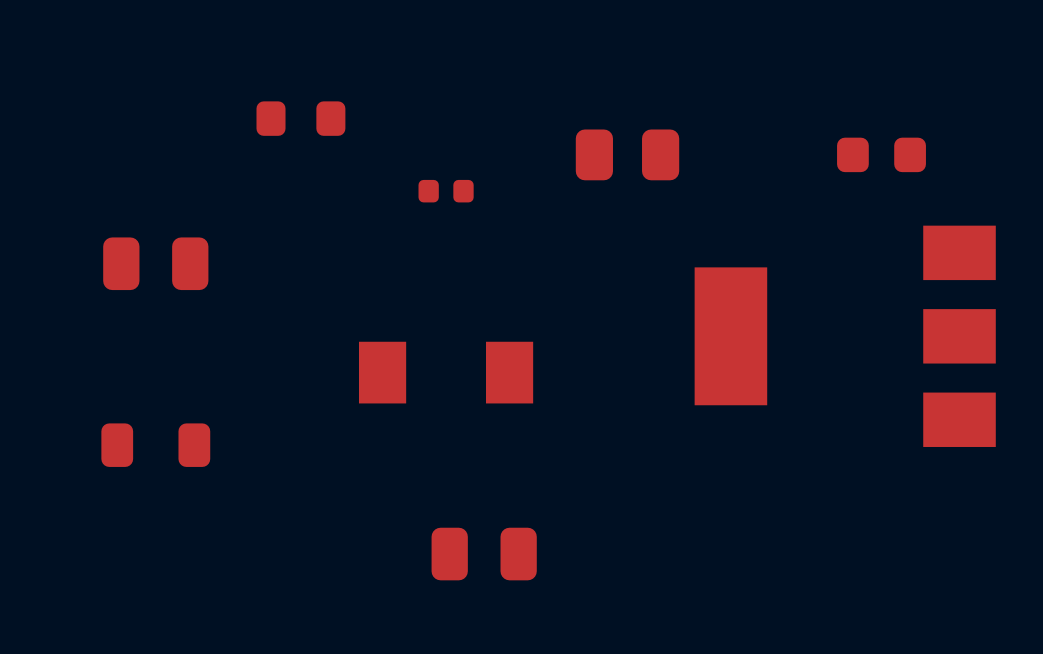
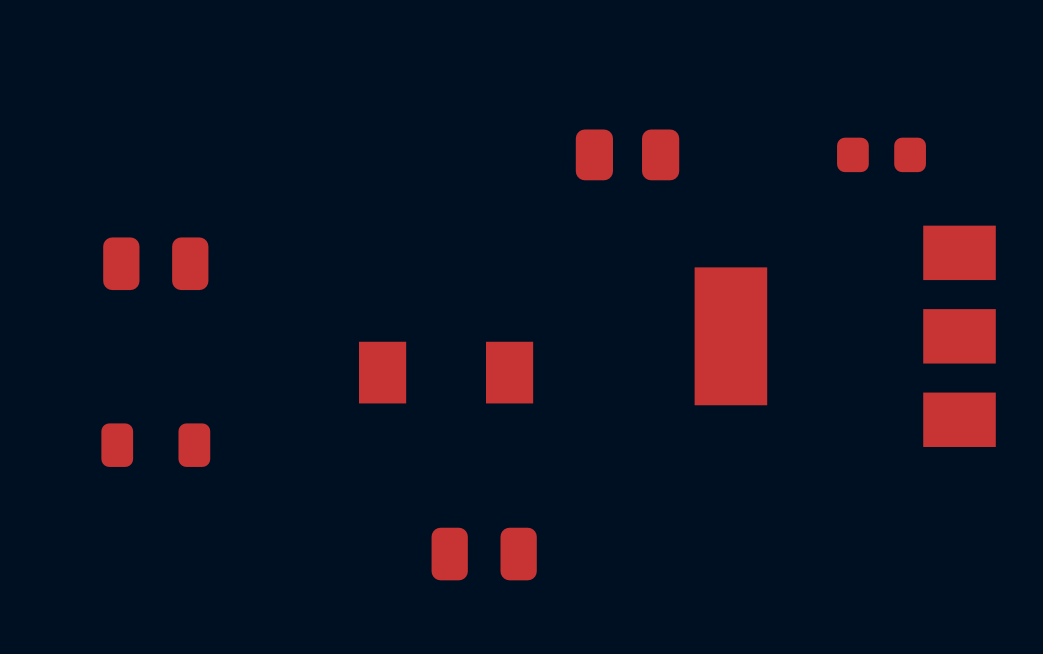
part: (300, 118) -> none
part: (446, 191) -> none

